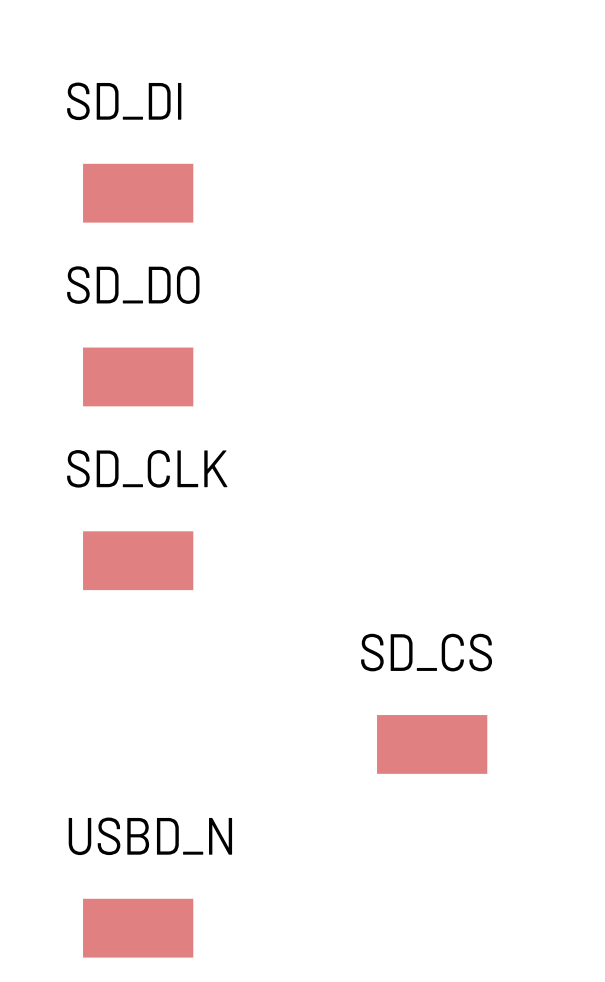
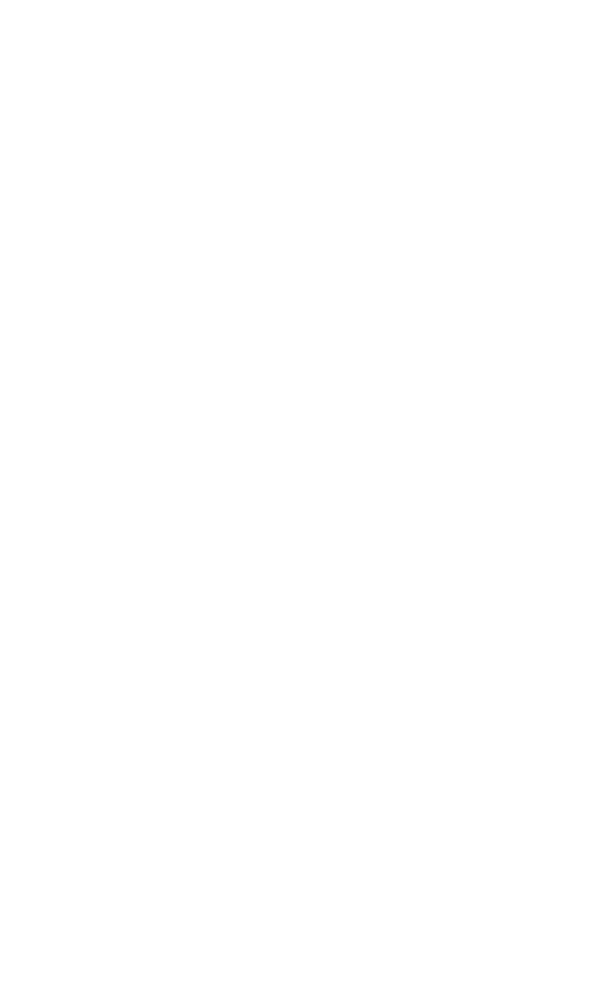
SD_DI: (138, 193) -> none
SD_DO: (138, 376) -> none
SD_CLK: (138, 560) -> none
SD_CS: (432, 744) -> none
USBD_N: (138, 928) -> none

